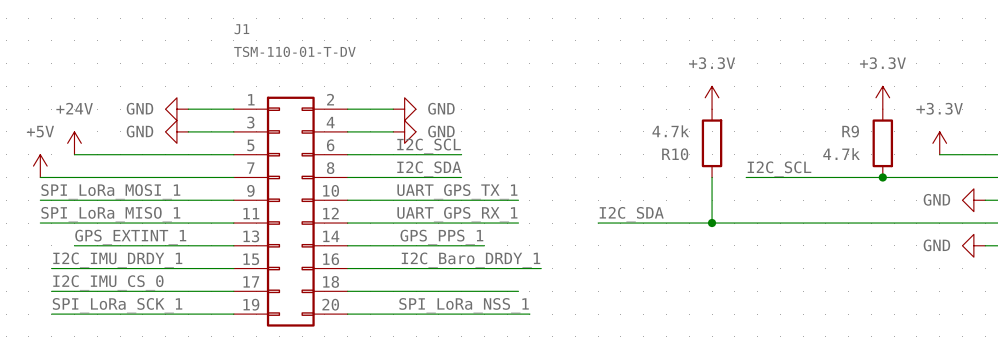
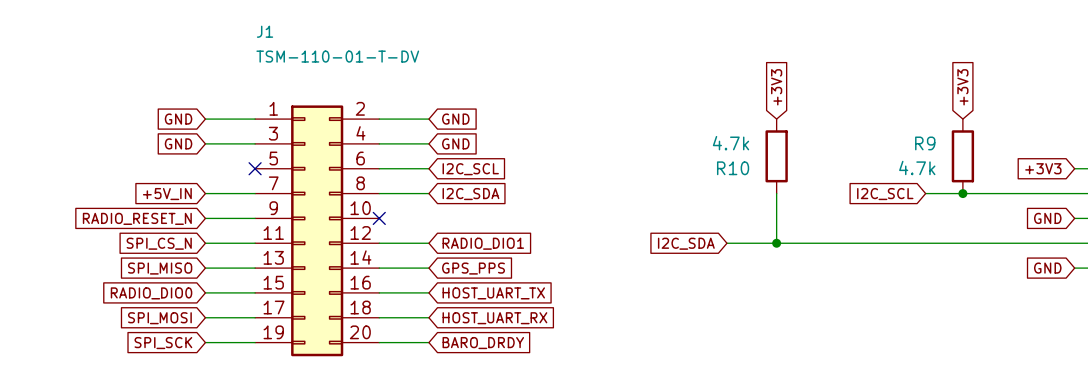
global label: none -> +3V3 (776, 87)
global label: none -> +3V3 (962, 87)
power symbol: +3.3V (712, 97) -> none
power symbol: +3.3V (882, 97) -> none
global label: none -> GND (178, 119)
power symbol: GND (176, 109) -> none
power symbol: GND (404, 109) -> none
global label: none -> GND (455, 119)
global label: none -> GND (178, 143)
power symbol: GND (176, 131) -> none
power symbol: GND (404, 131) -> none
global label: none -> GND (455, 143)
power symbol: +24V (74, 143) -> none
power symbol: +3.3V (939, 143) -> none
label: I2C_SCL (429, 146) -> none
wire: (74, 154) (233, 154) -> none
no-connect mark: none -> (255, 168)
wire: (393, 154) (461, 154) -> none
wire: (939, 154) (985, 154) -> none
global label: none -> +3V3 (1043, 168)
global label: none -> I2C_SCL (470, 169)
power symbol: +5V (40, 166) -> none
label: I2C_SDA (429, 169) -> none
label: I2C_SCL (779, 169) -> none
wire: (40, 177) (188, 177) -> none
wire: (393, 177) (461, 177) -> none
wire: (746, 177) (848, 177) -> none
global label: none -> +5V_IN (167, 194)
global label: none -> I2C_SDA (470, 194)
global label: none -> I2C_SCL (885, 194)
label: SPI_LoRa_MOSI_1 (110, 191) -> none
label: UART_GPS_TX_1 (457, 191) -> none
wire: (40, 200) (188, 200) -> none
wire: (347, 200) (518, 200) -> none
no-connect mark: none -> (379, 218)
global label: none -> GND (1047, 218)
power symbol: GND (973, 200) -> none
global label: none -> RADIO_RESET_N (137, 218)
label: SPI_LoRa_MISO_1 (110, 214) -> none
label: UART_GPS_RX_1 (457, 214) -> none
label: I2C_SDA (631, 214) -> none
wire: (40, 223) (188, 223) -> none
wire: (393, 223) (518, 223) -> none
wire: (598, 223) (666, 223) -> none
global label: none -> SPI_CS_N (159, 243)
global label: none -> RADIO_DIO1 (483, 243)
global label: none -> I2C_SDA (686, 243)
label: GPS_EXTINT_1 (130, 237) -> none
label: GPS_PPS_1 (441, 237) -> none
wire: (74, 245) (188, 245) -> none
wire: (393, 245) (484, 245) -> none
global label: none -> GND (1047, 268)
power symbol: GND (973, 245) -> none
global label: none -> SPI_MISO (160, 268)
global label: none -> GPS_PPS (473, 268)
label: I2C_IMU_DRDY_1 (117, 260) -> none
label: I2C_Baro_DRDY_1 (470, 260) -> none
wire: (51, 268) (188, 268) -> none
wire: (393, 268) (541, 268) -> none
global label: none -> RADIO_DIO0 (151, 293)
global label: none -> HOST_UART_TX (493, 293)
label: I2C_IMU_CS_0 (108, 282) -> none
wire: (51, 291) (188, 291) -> none
wire: (393, 291) (518, 291) -> none
global label: none -> SPI_MOSI (159, 318)
global label: none -> HOST_UART_RX (494, 318)
label: SPI_LoRa_SCK_1 (117, 305) -> none
label: SPI_LoRa_NSS_1 (464, 305) -> none
wire: (51, 314) (188, 314) -> none
wire: (393, 314) (529, 314) -> none
global label: none -> SPI_SCK (163, 343)
global label: none -> BARO_DRDY (483, 343)

